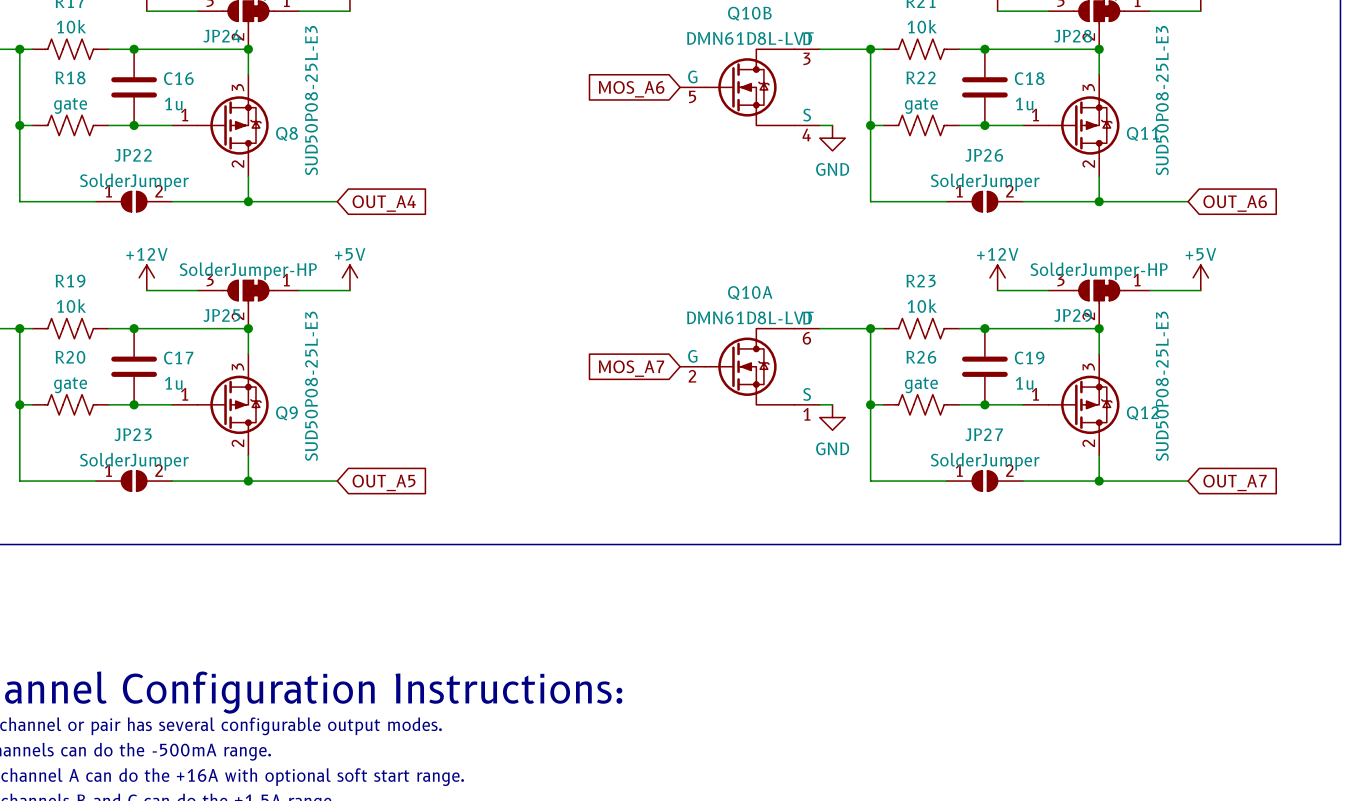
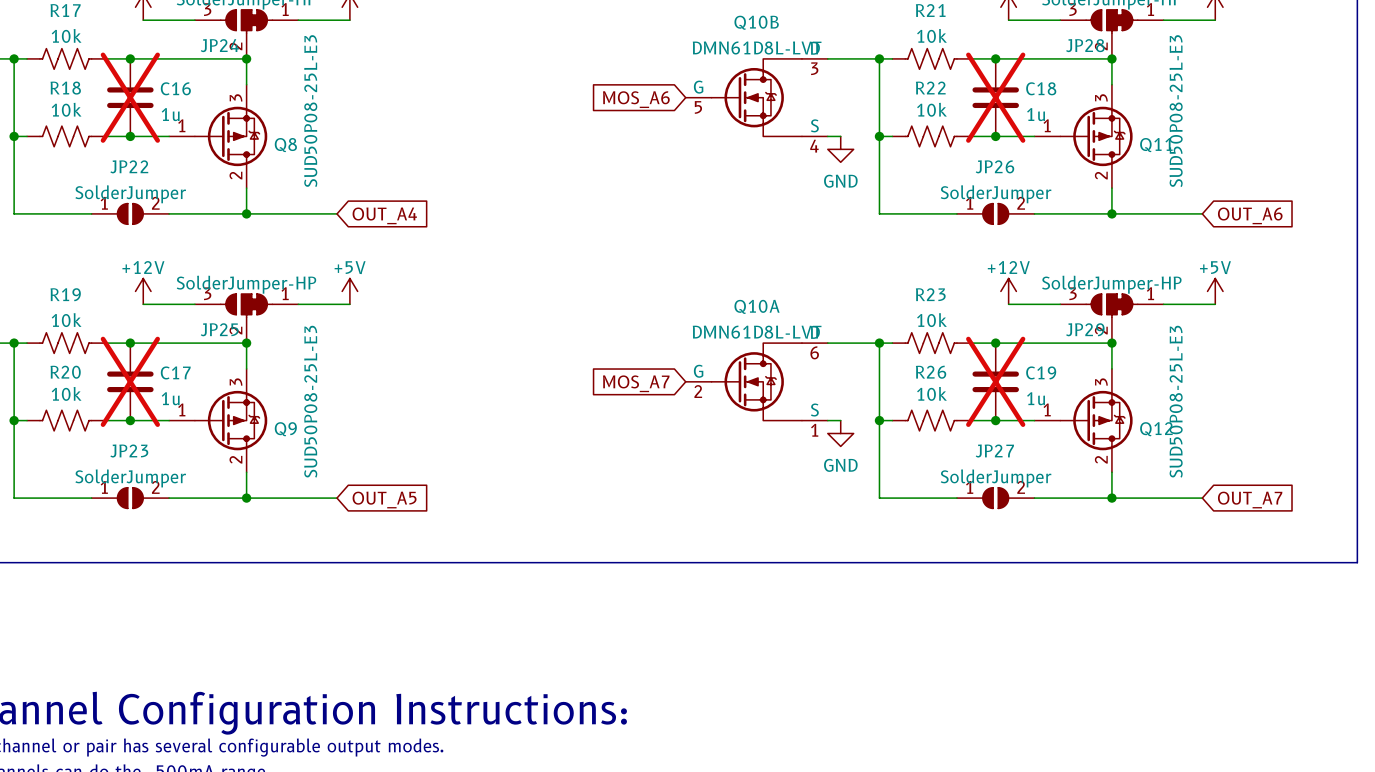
C16 do-not-place cross: none -> (130, 97)
C18 do-not-place cross: none -> (995, 97)
R18 value: gate (70, 105) -> 10k (66, 109)
R22 value: gate (921, 105) -> 10k (931, 109)
C17 do-not-place cross: none -> (130, 381)
C19 do-not-place cross: none -> (995, 381)
R20 value: gate (70, 385) -> 10k (66, 393)
R26 value: gate (921, 385) -> 10k (931, 393)

